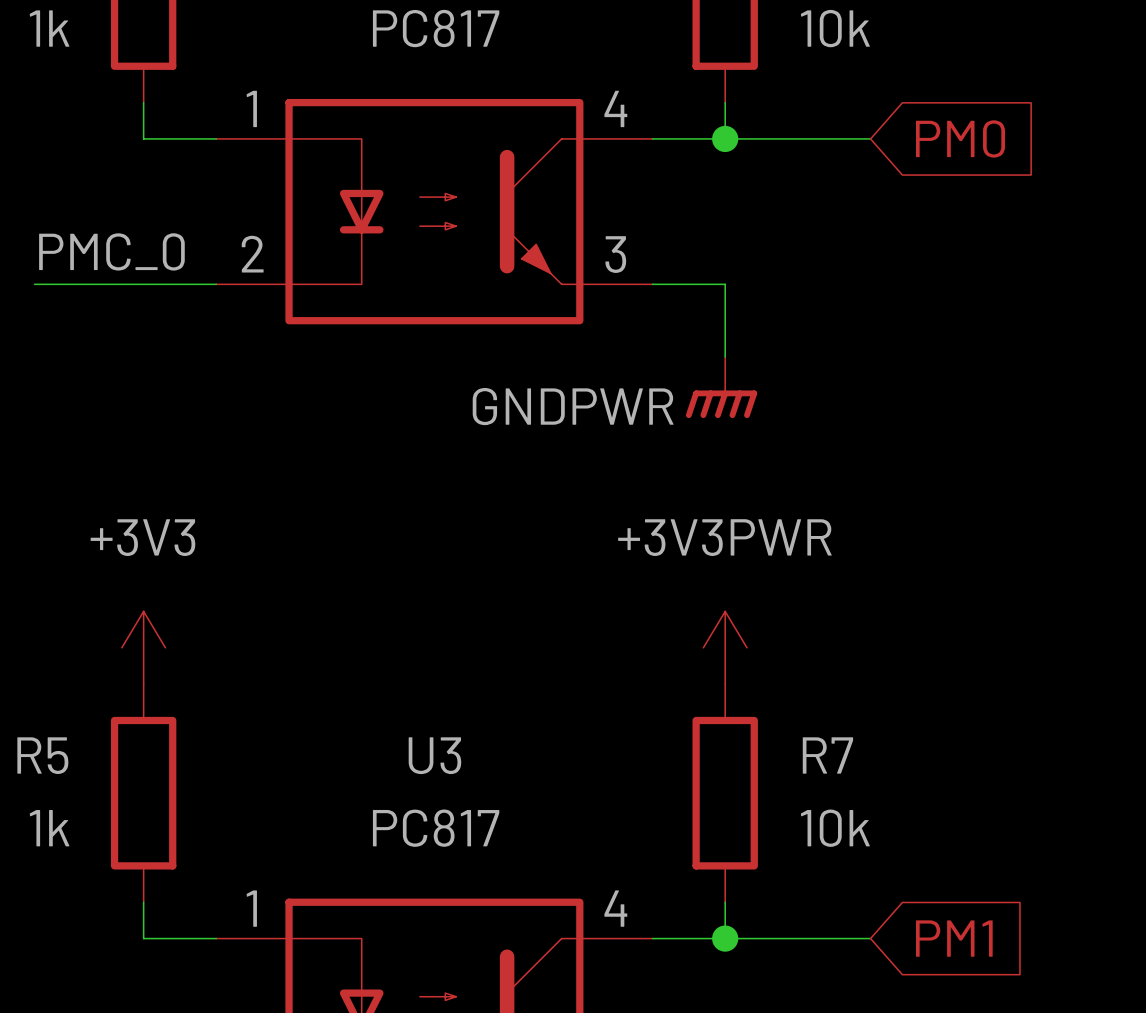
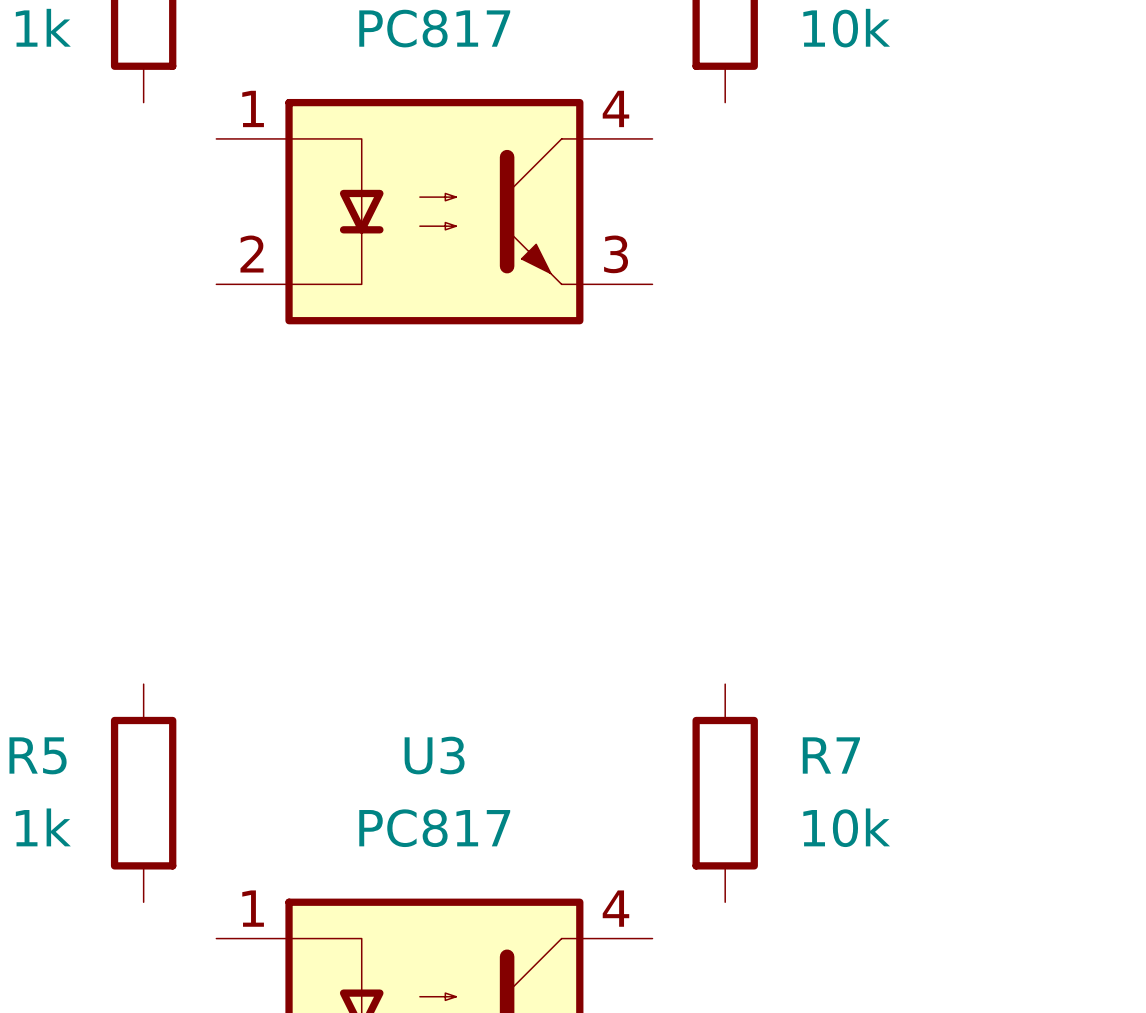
wire: (143, 102) (143, 138) (216, 138) -> none
wire: (725, 102) (725, 138) -> none
wire: (652, 138) (870, 138) -> none
junction: (725, 138) -> none
global label: PM0 (960, 138) -> none
label: PMC_0 (111, 251) -> none
wire: (34, 284) (216, 284) -> none
wire: (652, 284) (725, 284) (725, 357) -> none
power symbol: GNDPWR (721, 387) -> none
power symbol: +3V3 (143, 647) -> none
power symbol: +3V3PWR (725, 647) -> none
wire: (143, 902) (143, 938) (216, 938) -> none
wire: (725, 902) (725, 938) -> none
wire: (652, 938) (870, 938) -> none
junction: (725, 938) -> none
global label: PM1 (954, 938) -> none

